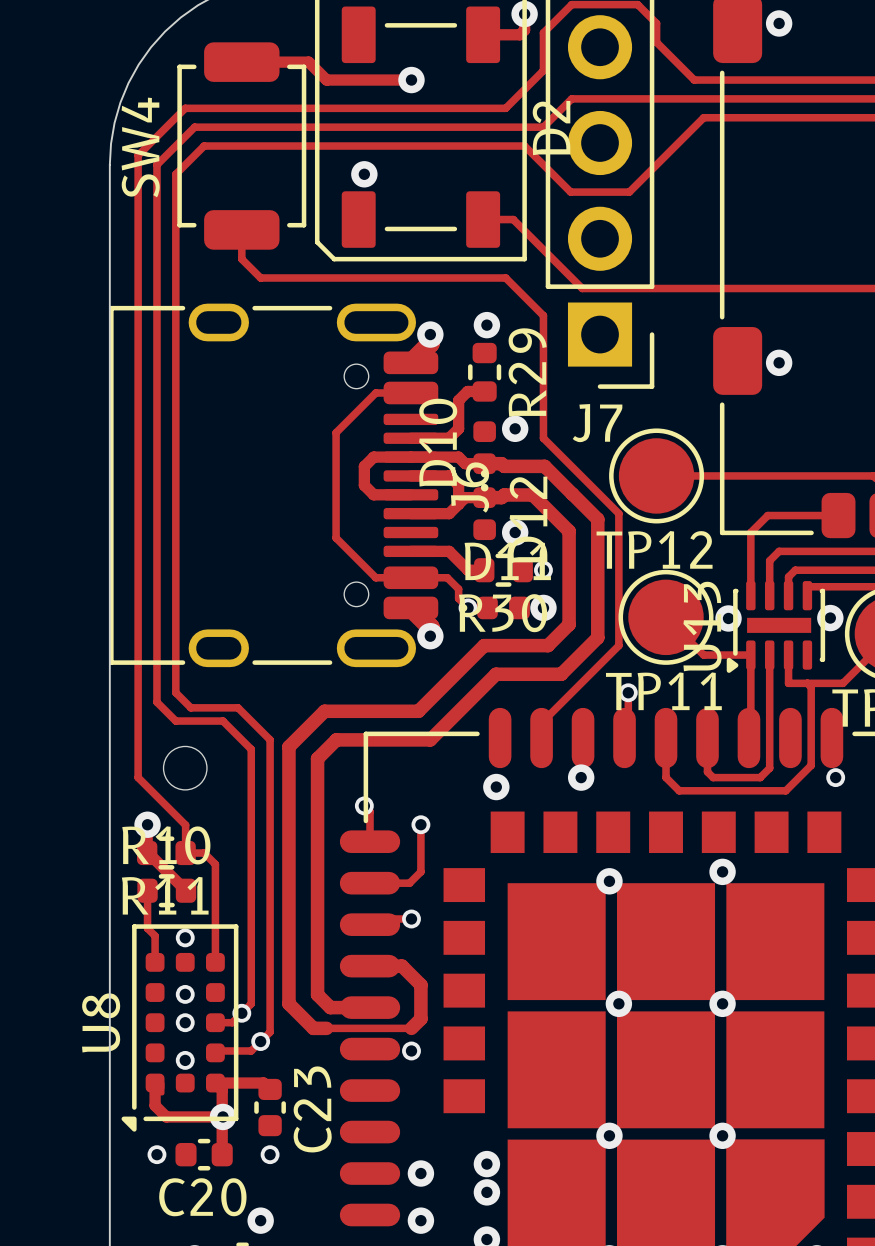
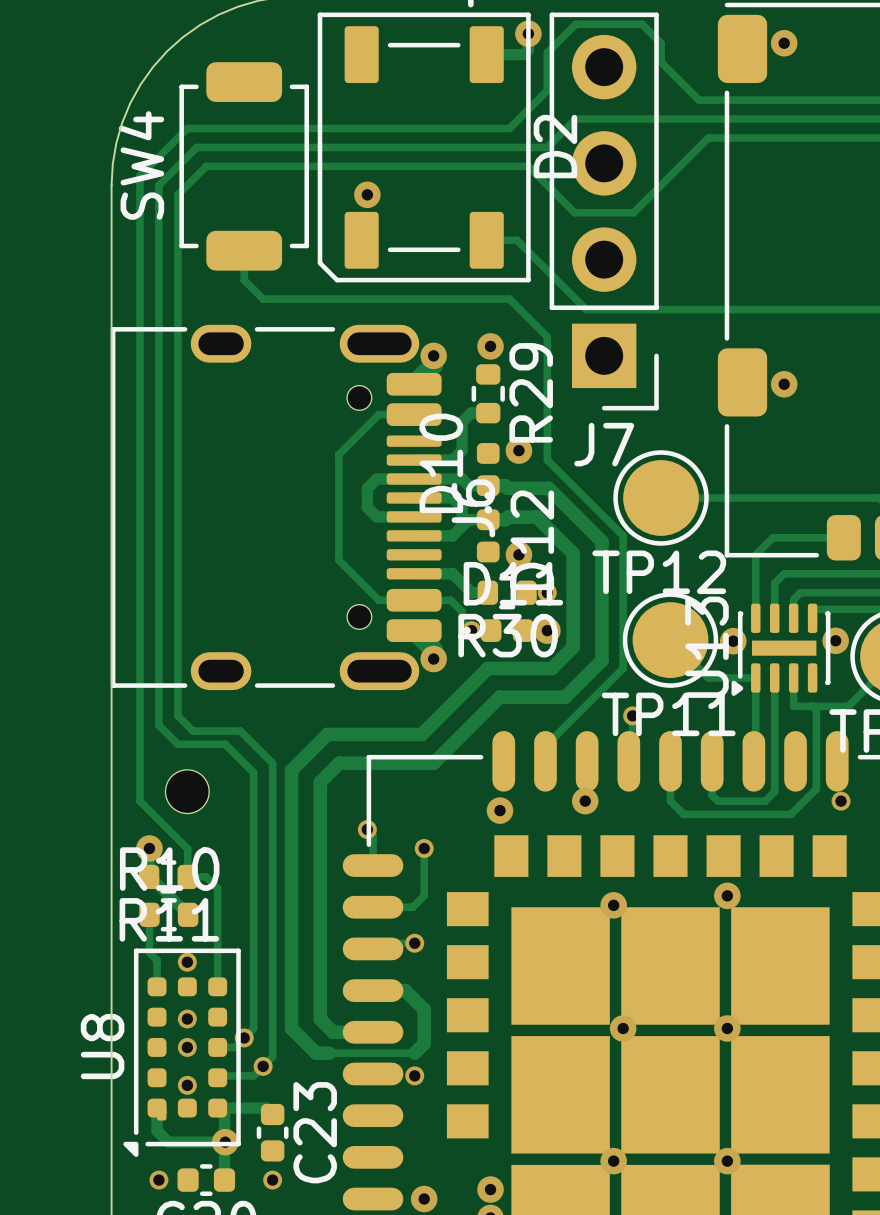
track: (241, 62) (308, 62) (326, 80) (411, 80) -> none
via: (411, 80) -> none

